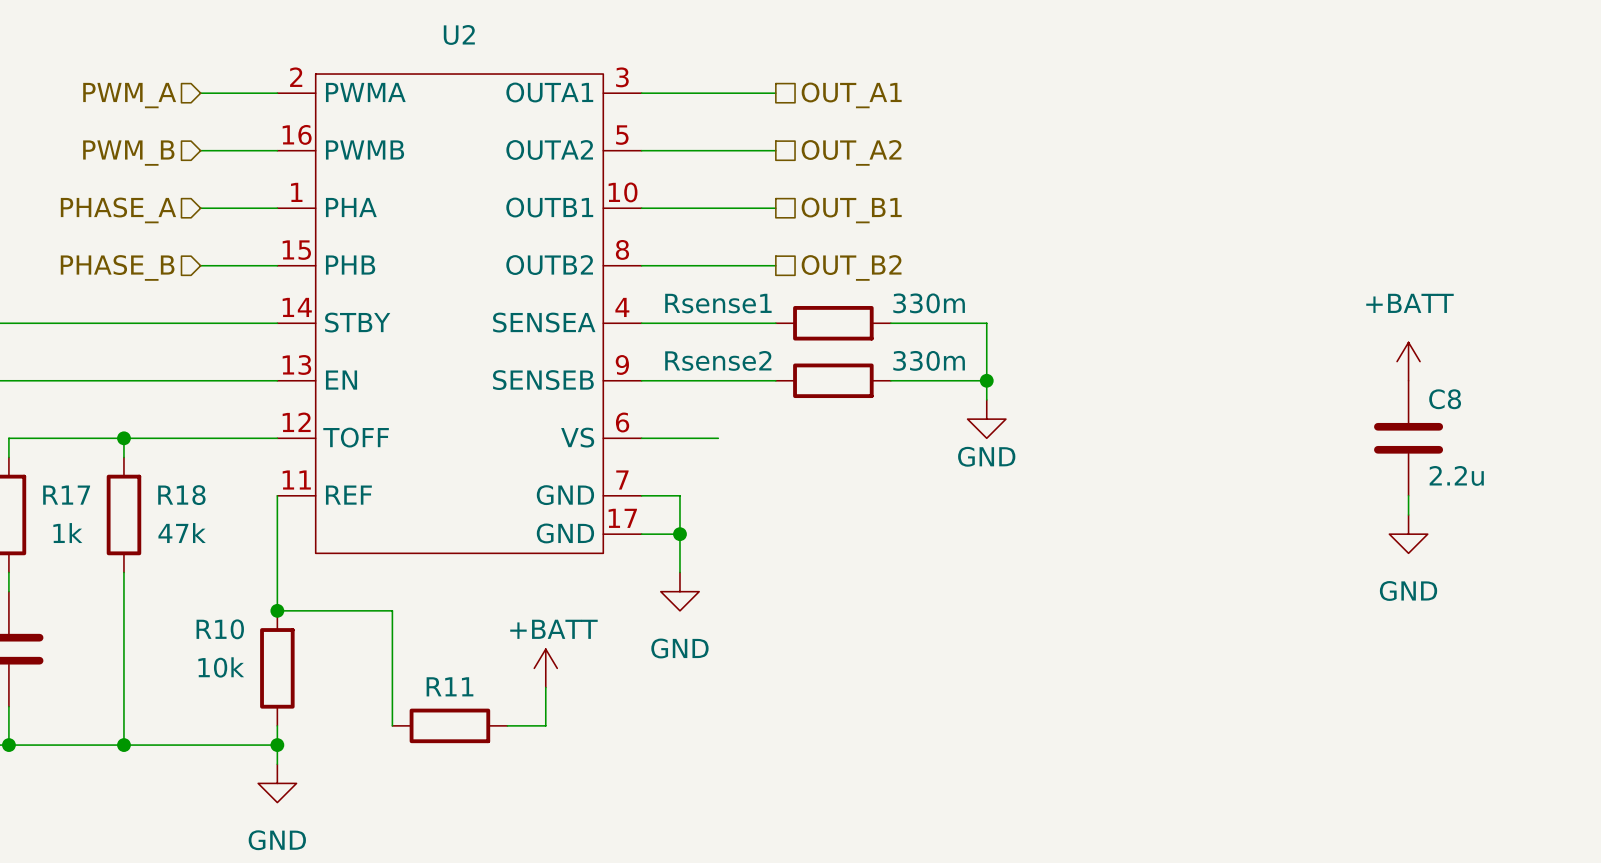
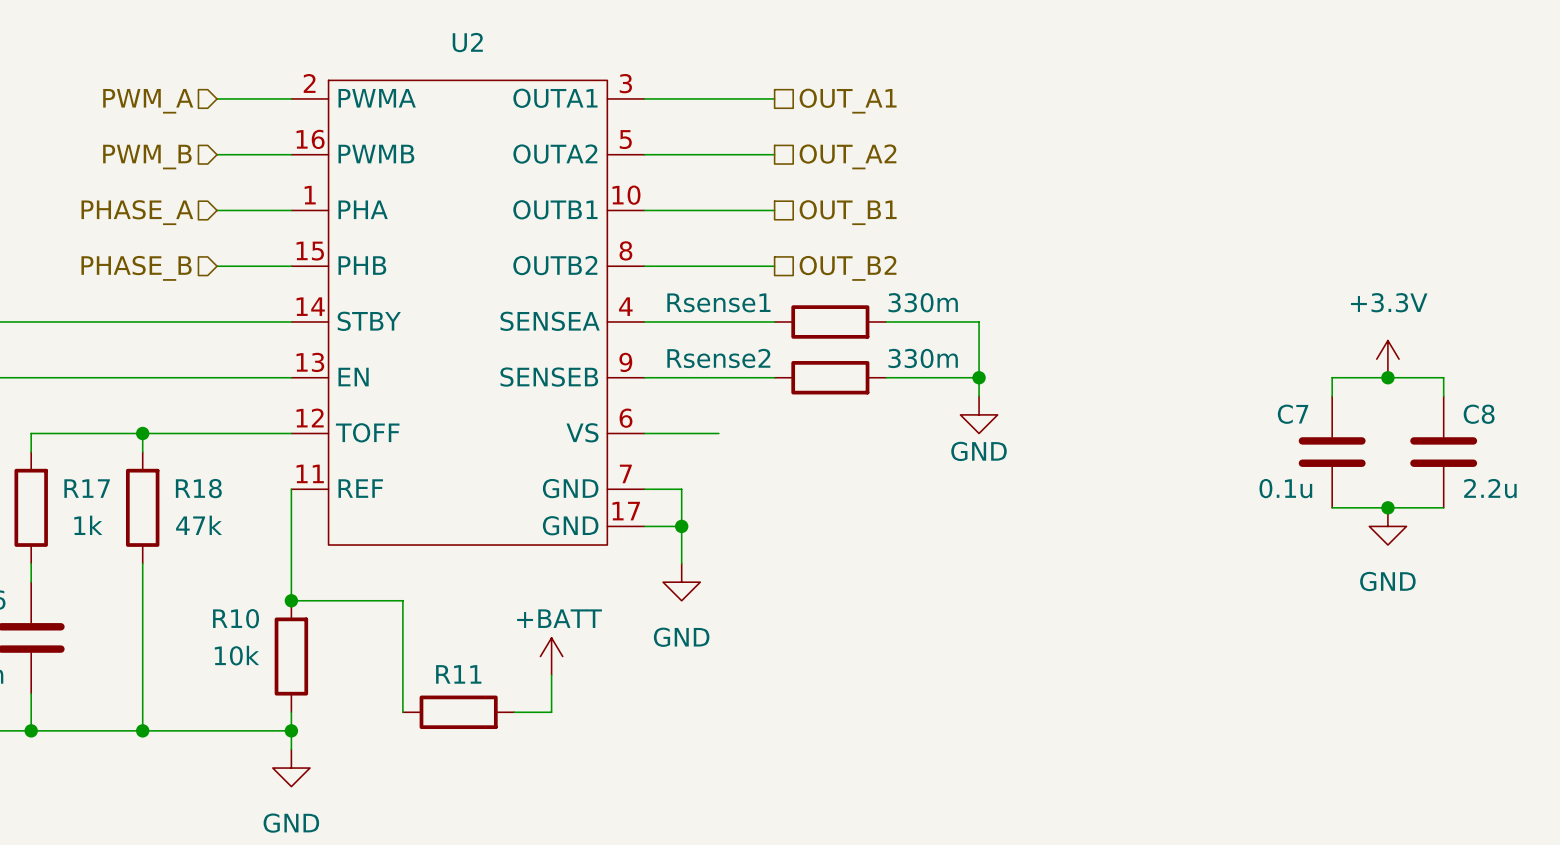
power symbol: +BATT (1408, 361) -> +3.3V (1387, 359)
junction: none -> (1387, 377)
wire: none -> (1332, 396) (1332, 377) (1443, 377) (1443, 396)
C8 position: (1408, 438) -> (1443, 452)
C7: none -> 0.1u (1332, 452)
wire: (1408, 495) (1408, 514) -> none
wire: none -> (1332, 507) (1443, 507)
junction: none -> (1387, 507)

